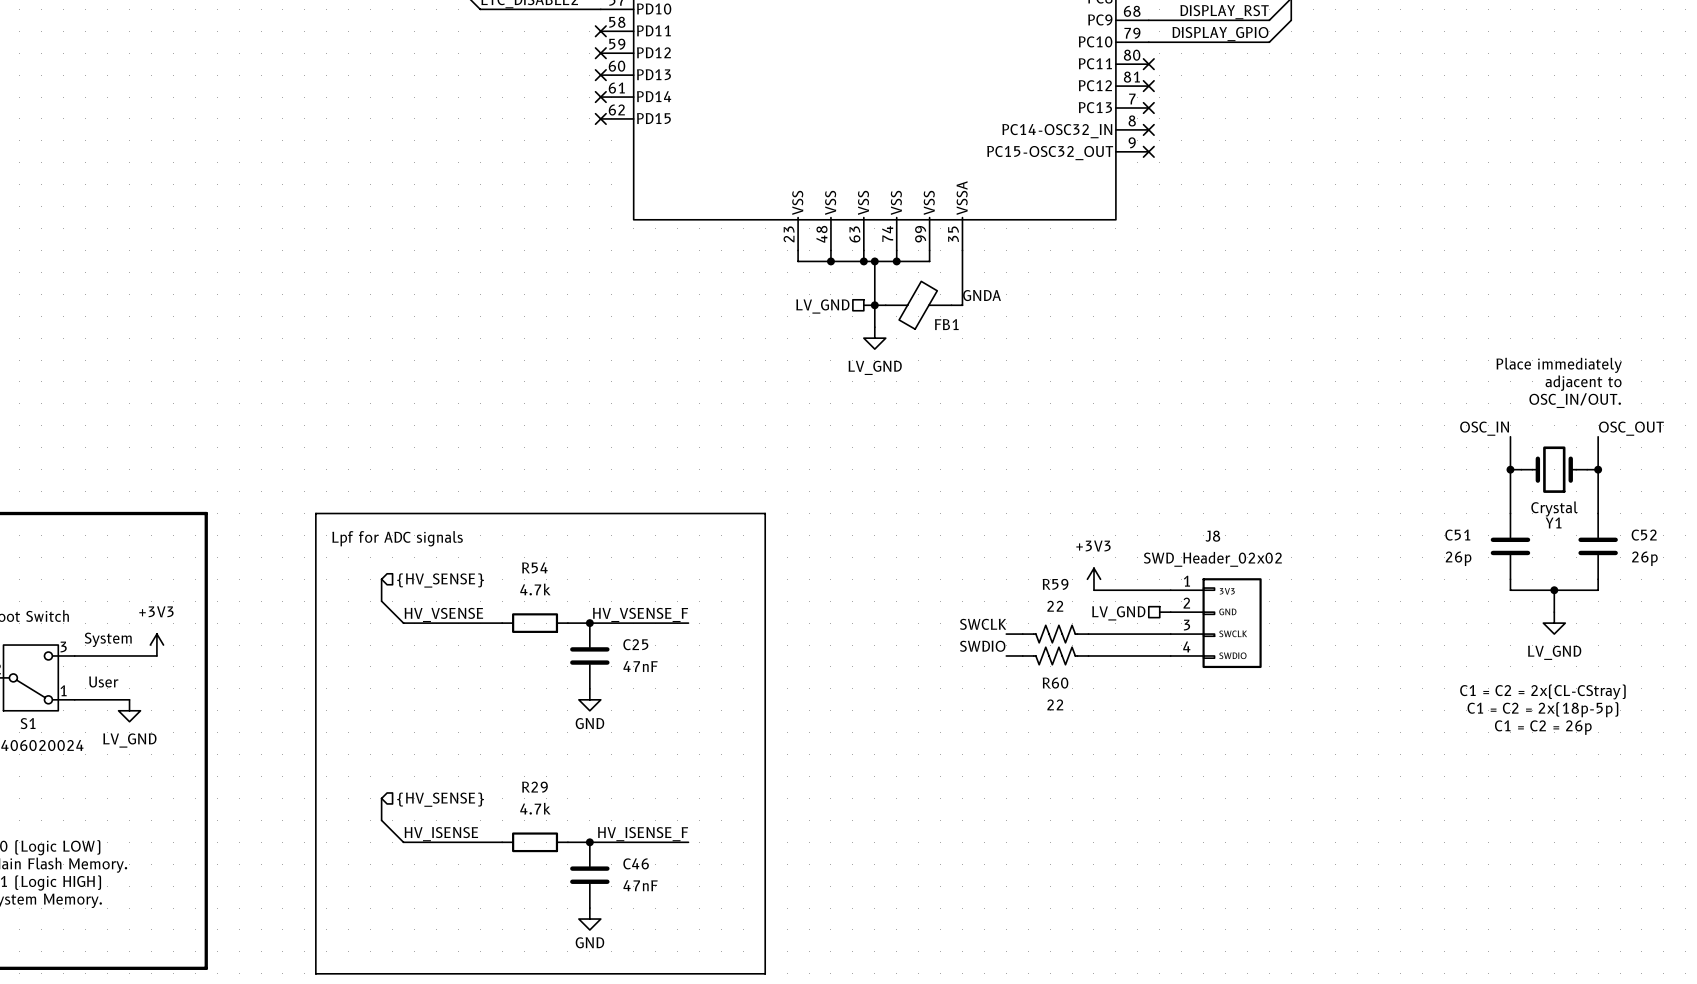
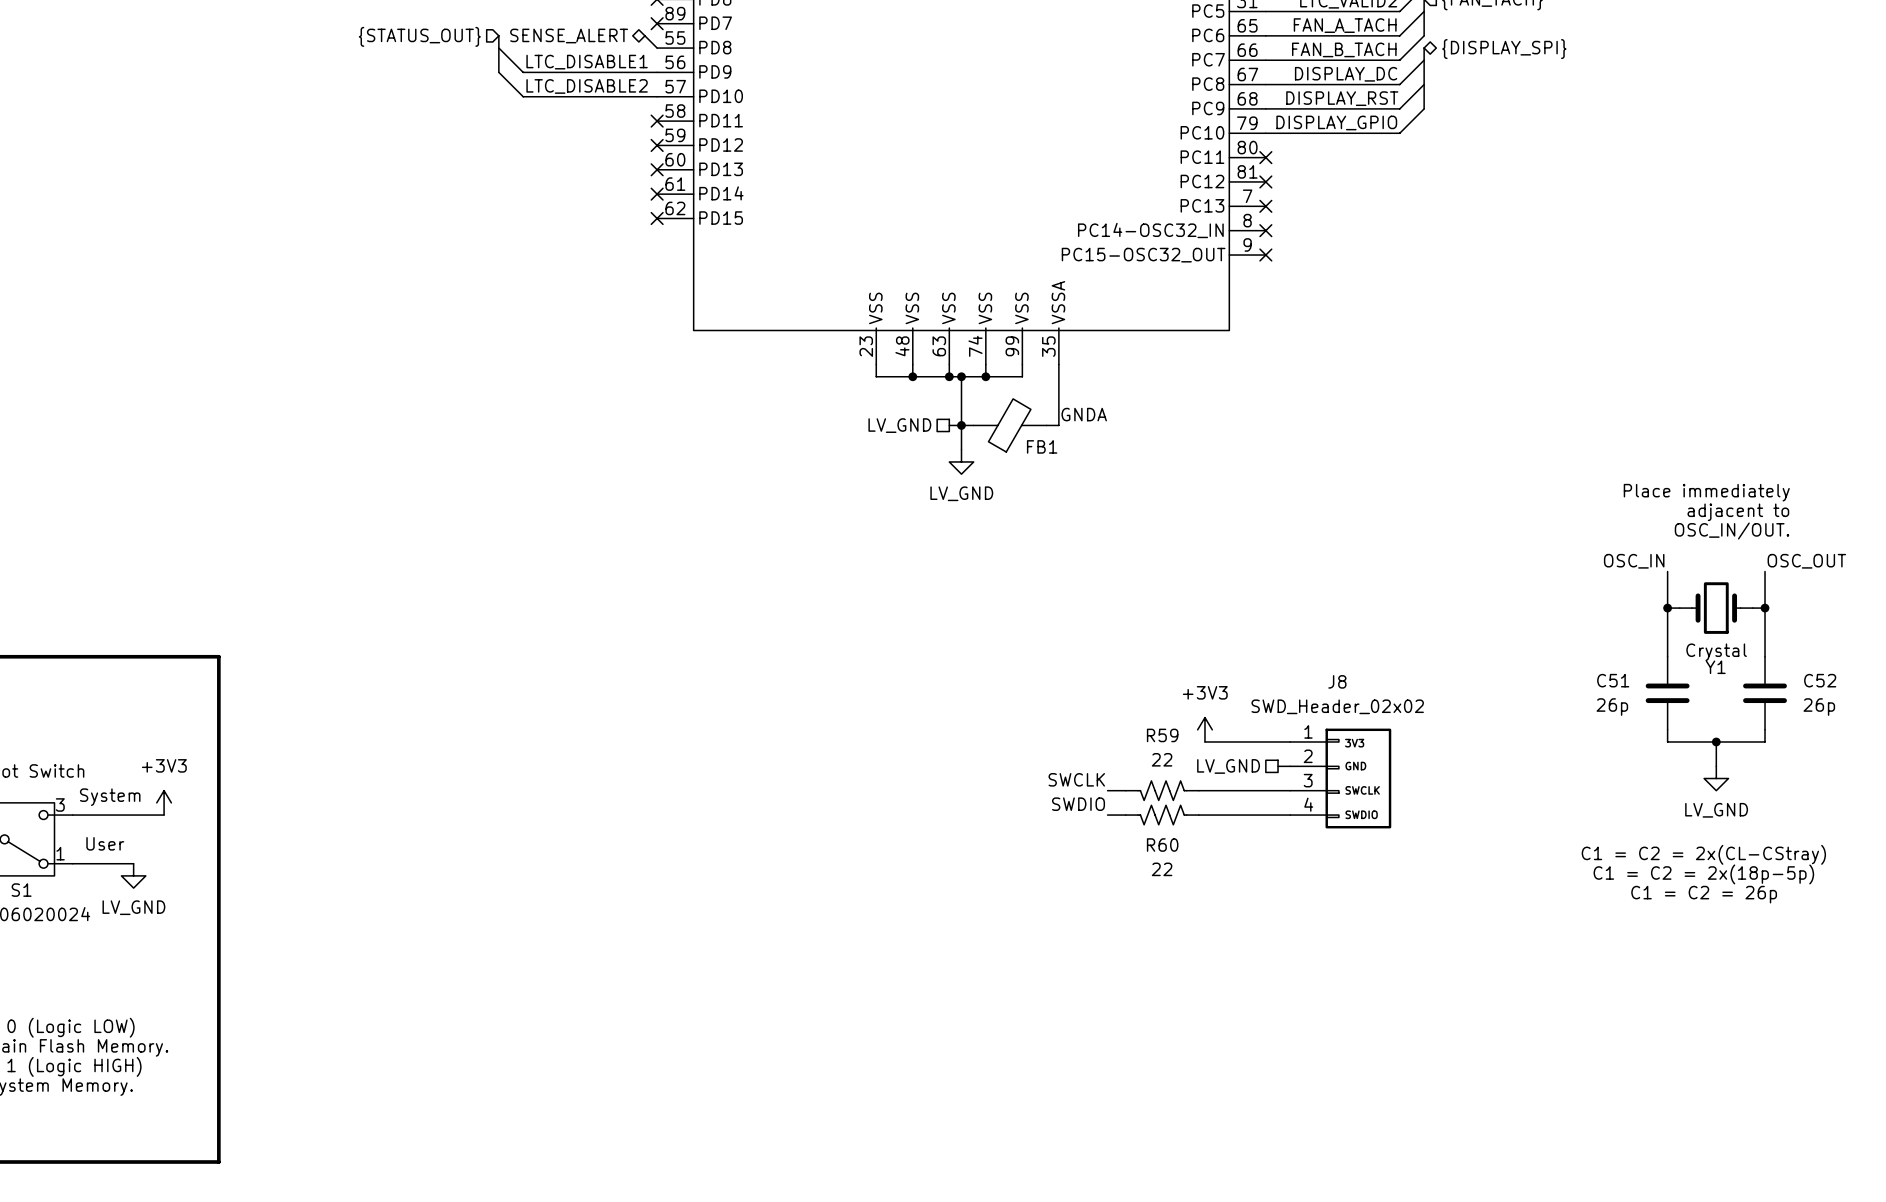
line: (315, 513) (765, 513) (765, 973) (315, 973) (315, 513) -> none
text: Lpf for ADC signals (397, 538) -> none
bus: (381, 579) (381, 601) -> none
hierarchical label: {HV_SENSE} (440, 580) -> none
wire: (381, 601) (403, 623) (502, 623) -> none
label: HV_VSENSE (443, 614) -> none
label: HV_VSENSE_F (640, 614) -> none
R54: 4.7k (535, 623) -> none
wire: (567, 623) (688, 623) -> none
junction: (589, 623) -> none
C25: 47nF (589, 655) -> none
power symbol: GND (589, 699) -> none
bus: (381, 798) (381, 820) -> none
hierarchical label: {HV_SENSE} (440, 799) -> none
wire: (381, 820) (403, 842) (502, 842) -> none
label: HV_ISENSE (441, 834) -> none
label: HV_ISENSE_F (643, 834) -> none
R29: 4.7k (535, 842) -> none
wire: (567, 842) (688, 842) -> none
junction: (589, 842) -> none
C46: 47nF (589, 875) -> none
power symbol: GND (589, 919) -> none

